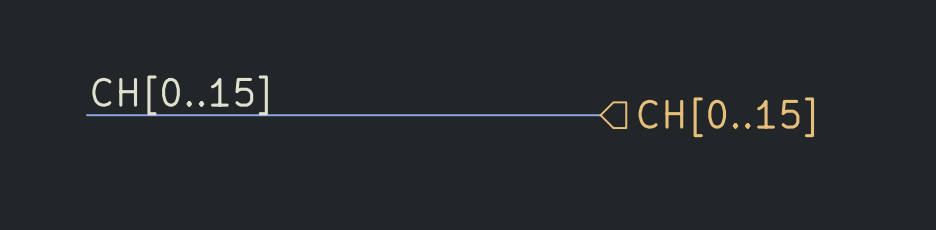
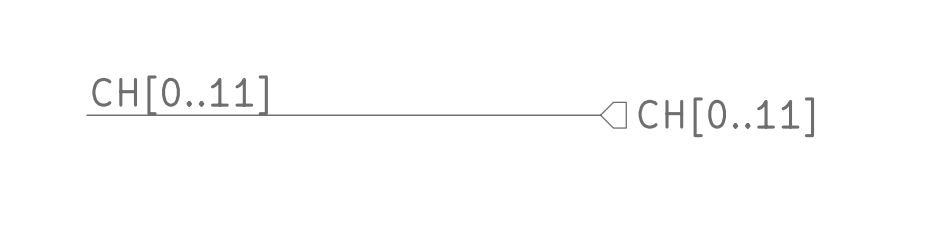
label: CH[0..15] (180, 95) -> CH[0..11] (180, 95)
hierarchical label: CH[0..15] (726, 117) -> CH[0..11] (726, 117)

